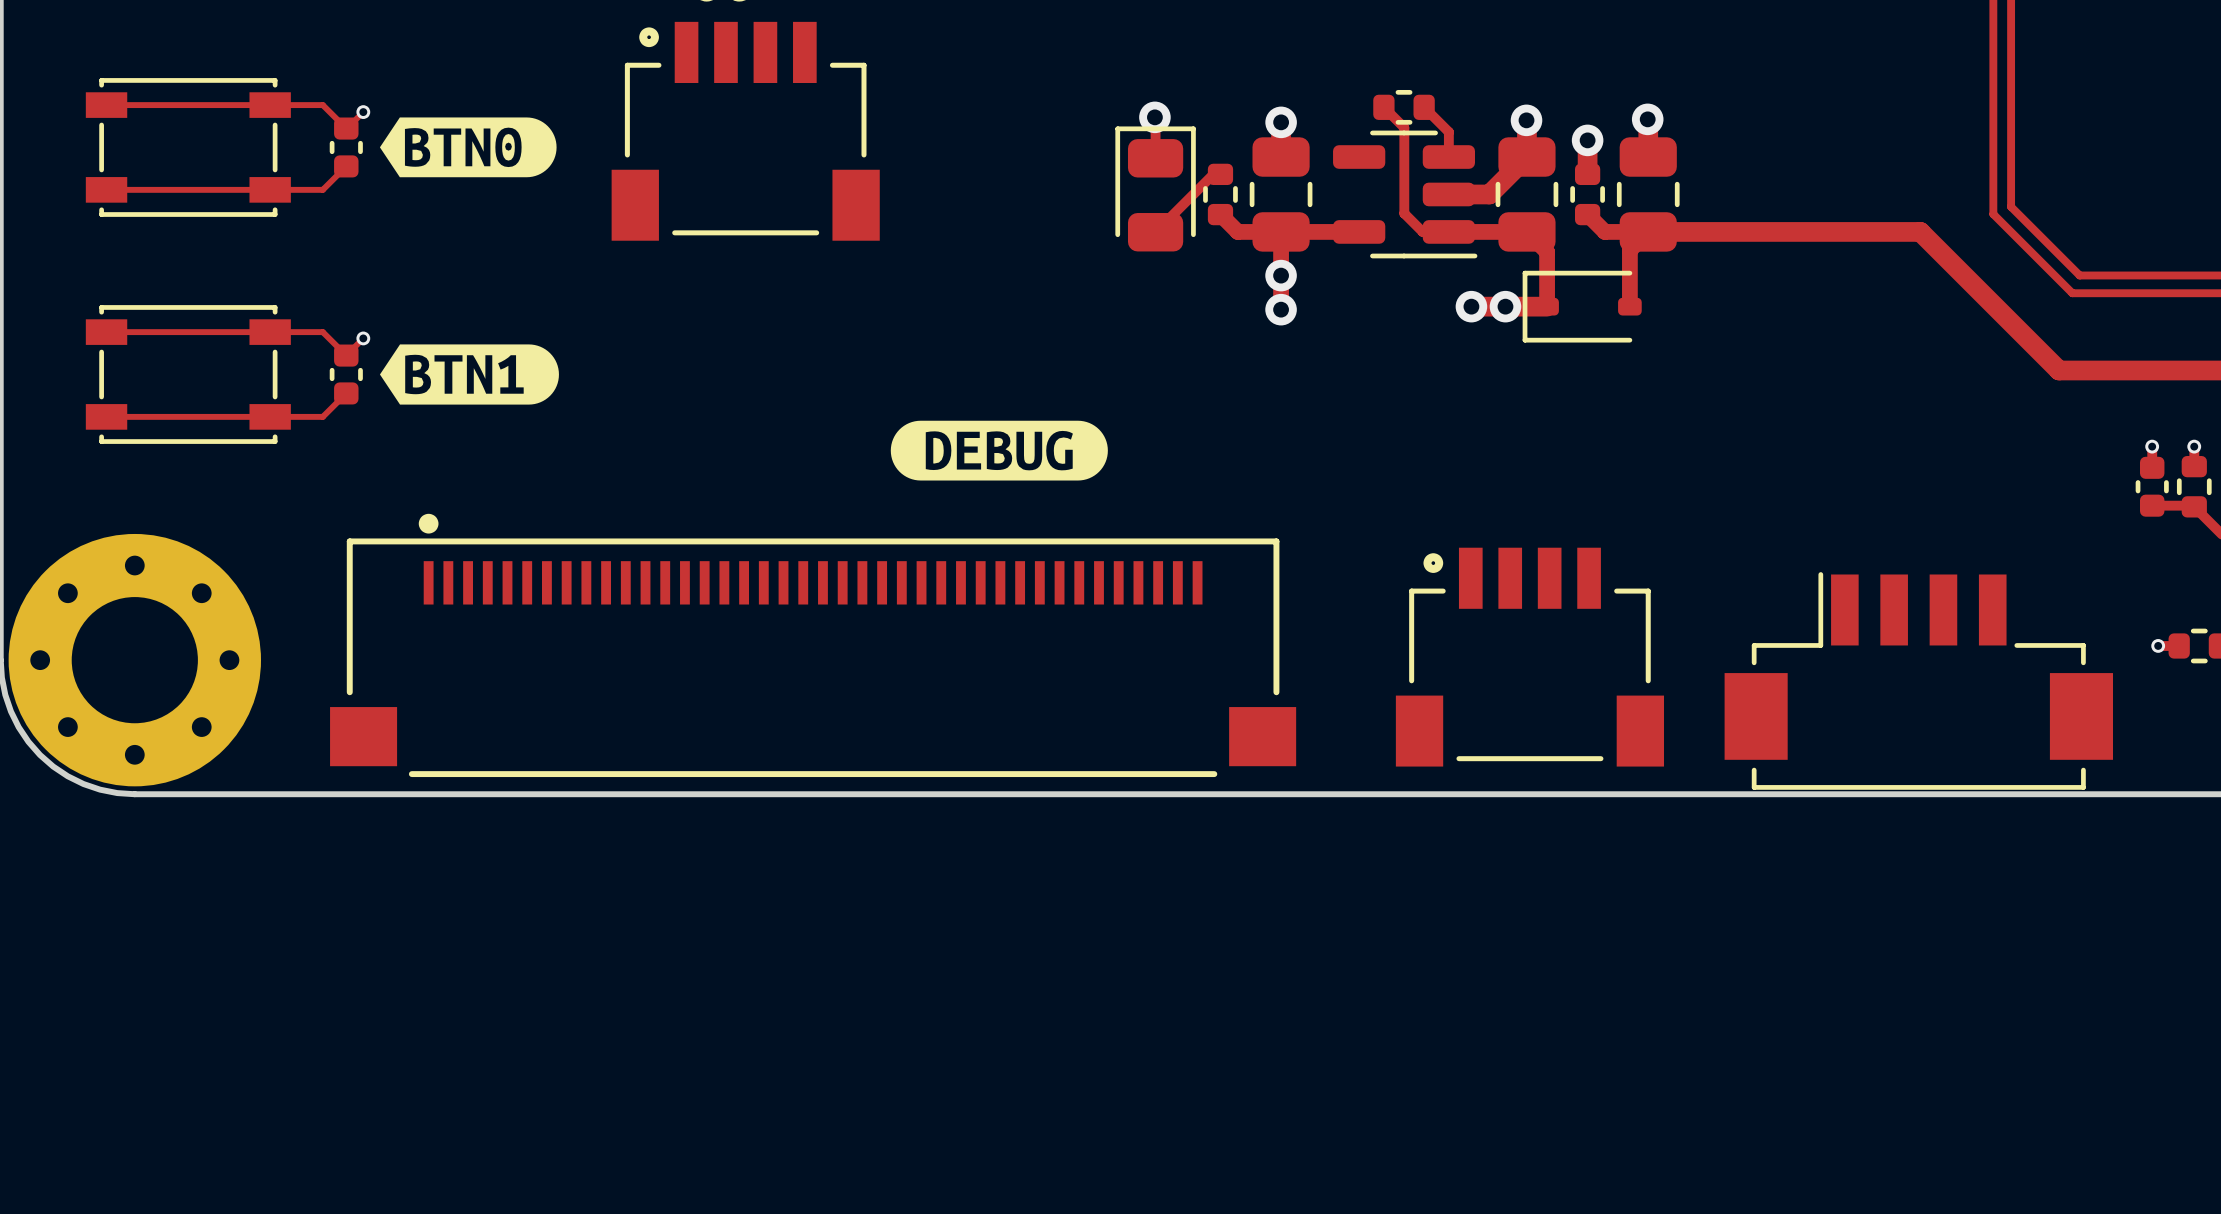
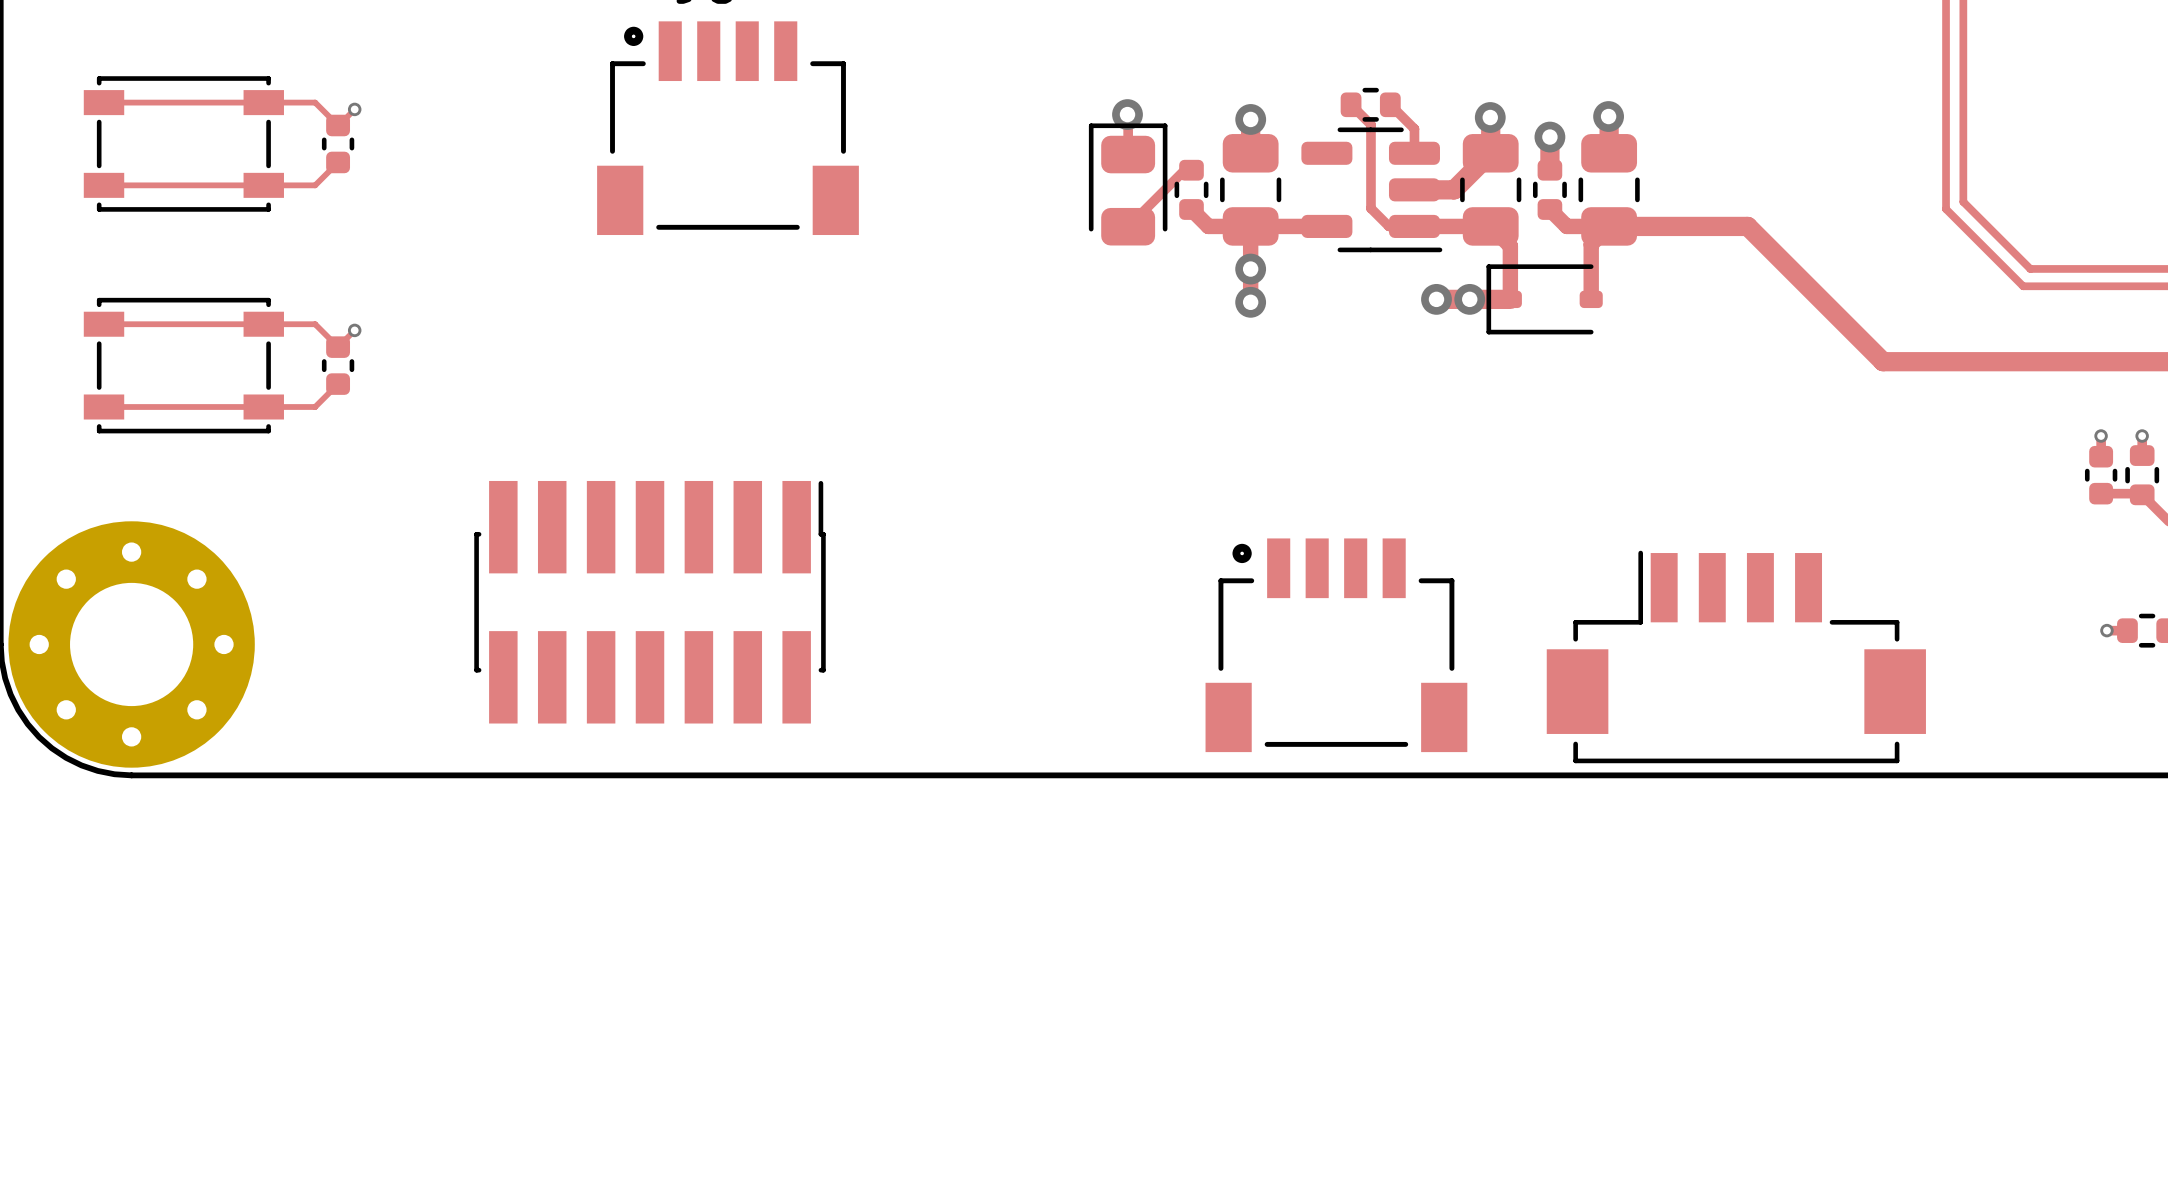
drawing: [379, 117, 557, 178] -> none
track: (1790, 231) (1920, 231) (2059, 370) -> (1747, 226) (1883, 361) (2010, 361)
drawing: [379, 344, 559, 405] -> none
drawing: [890, 420, 1108, 481] -> none
part: none -> (650, 602)
part: (813, 645) -> none
part position: (1529, 657) -> (1336, 645)
part position: (1918, 680) -> (1736, 656)

